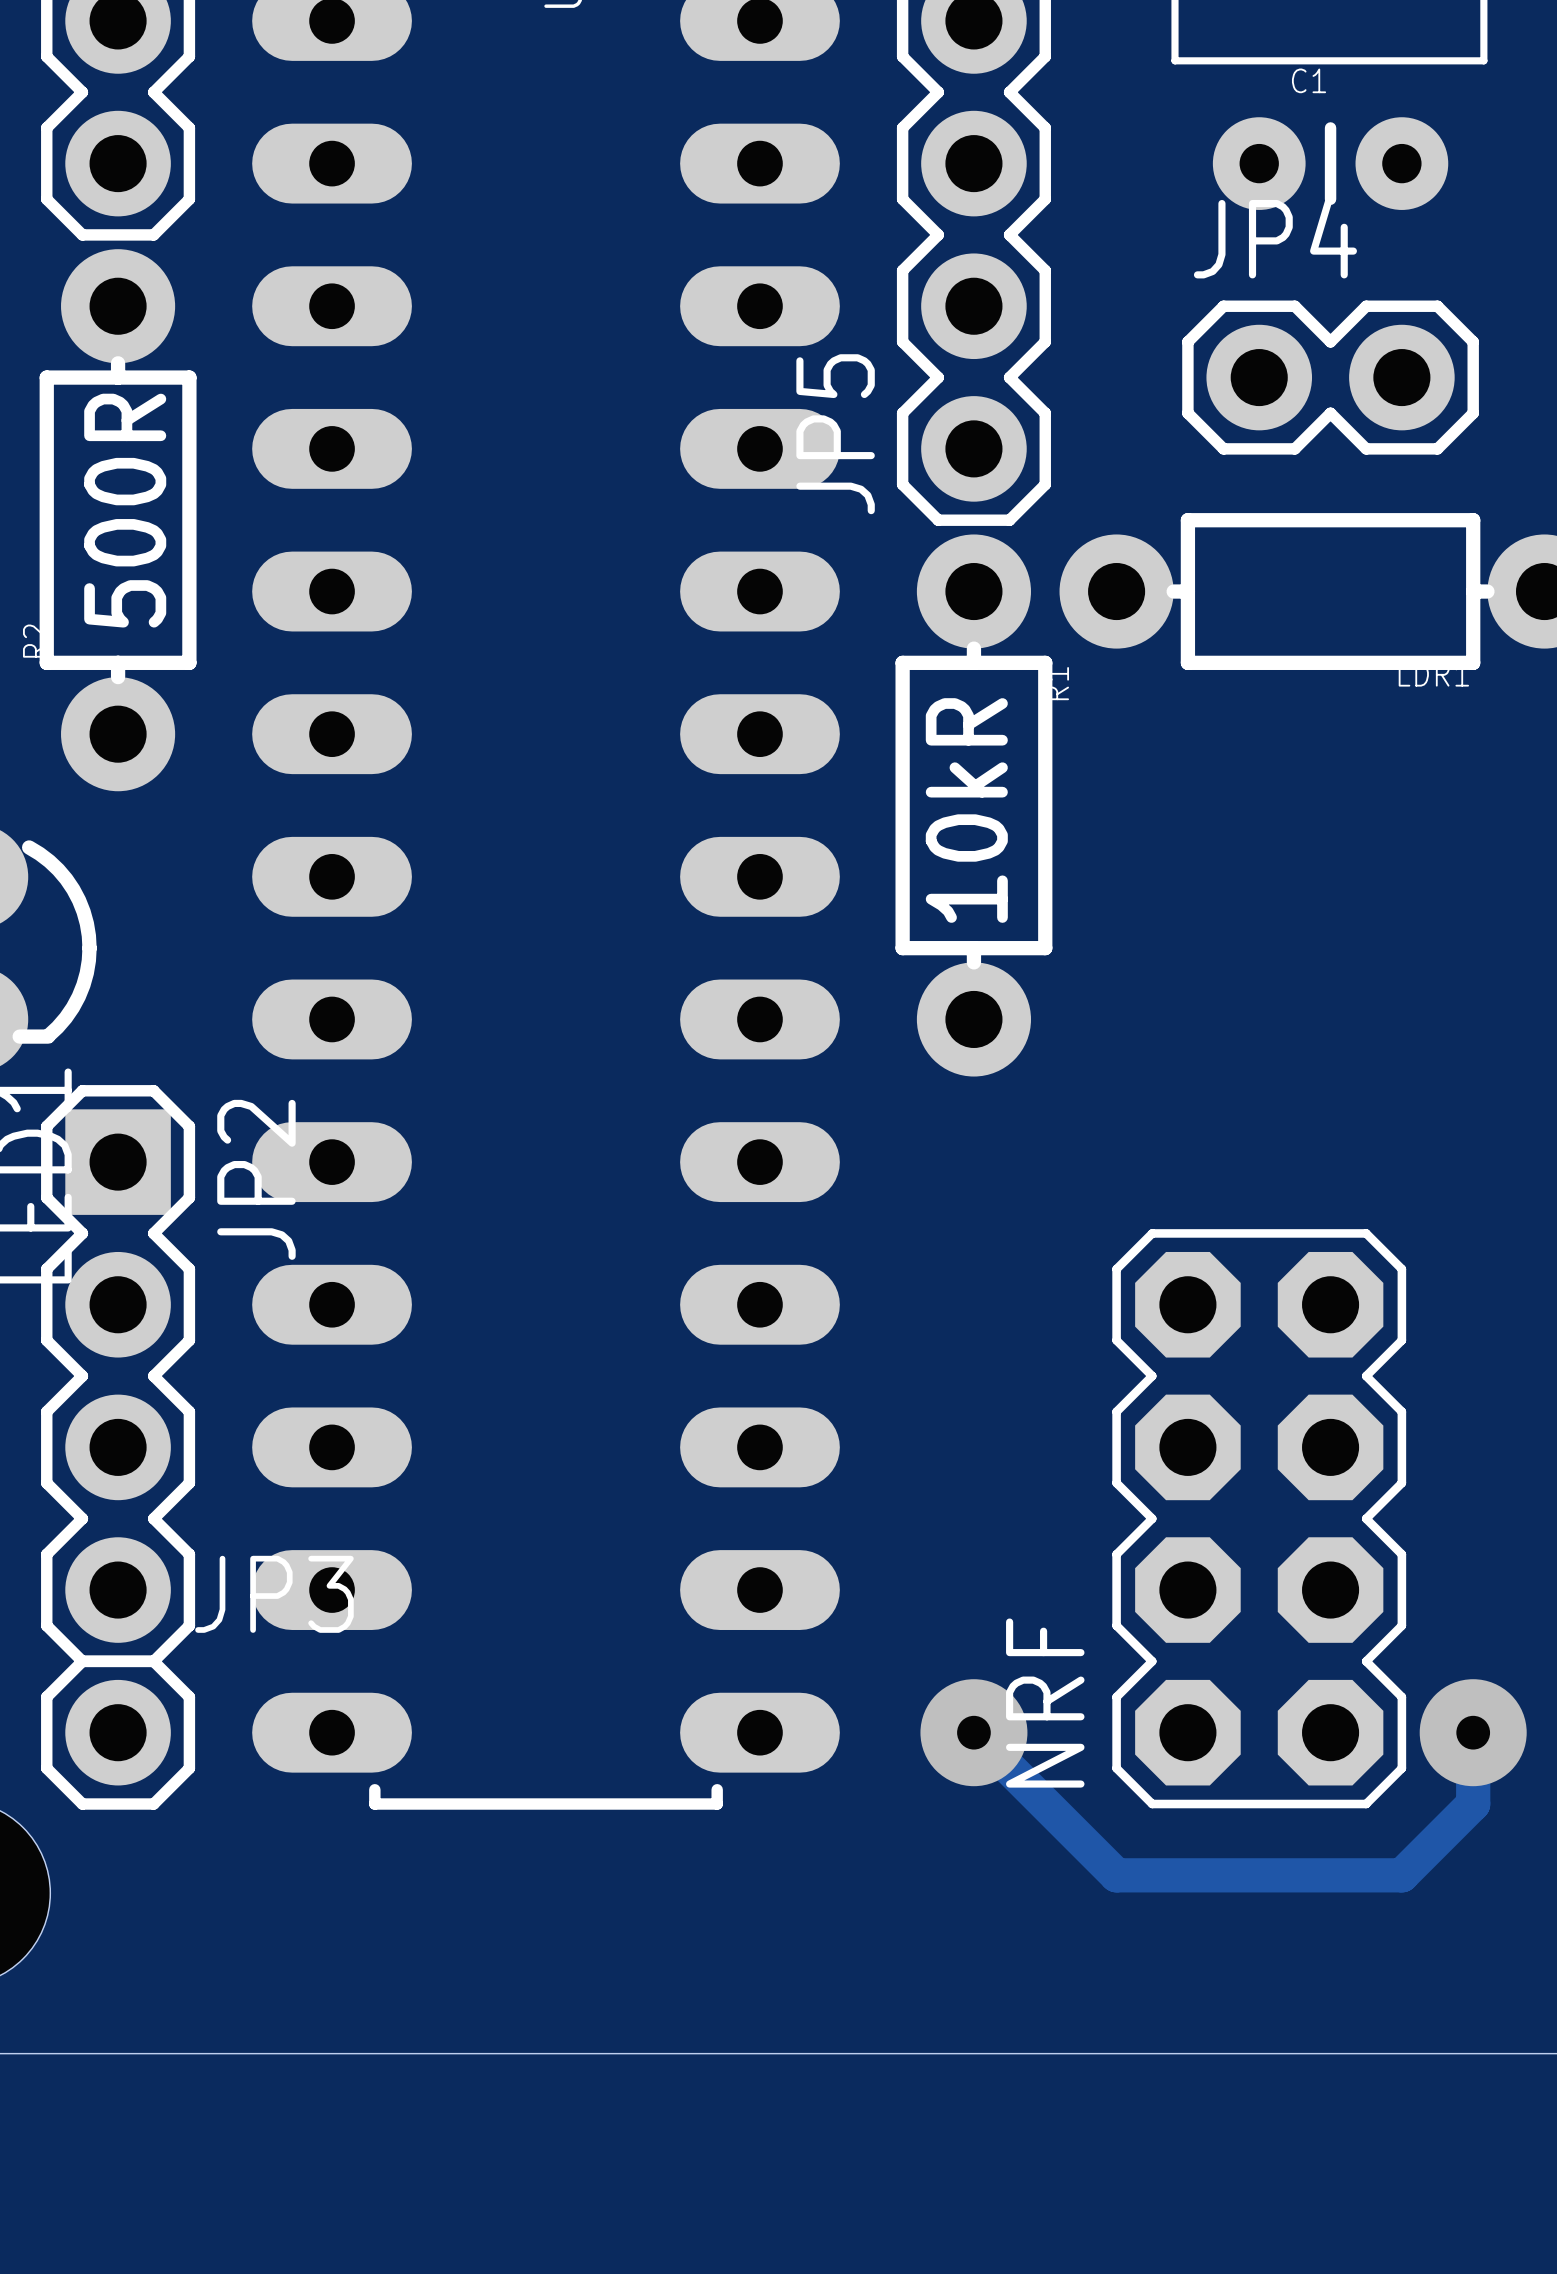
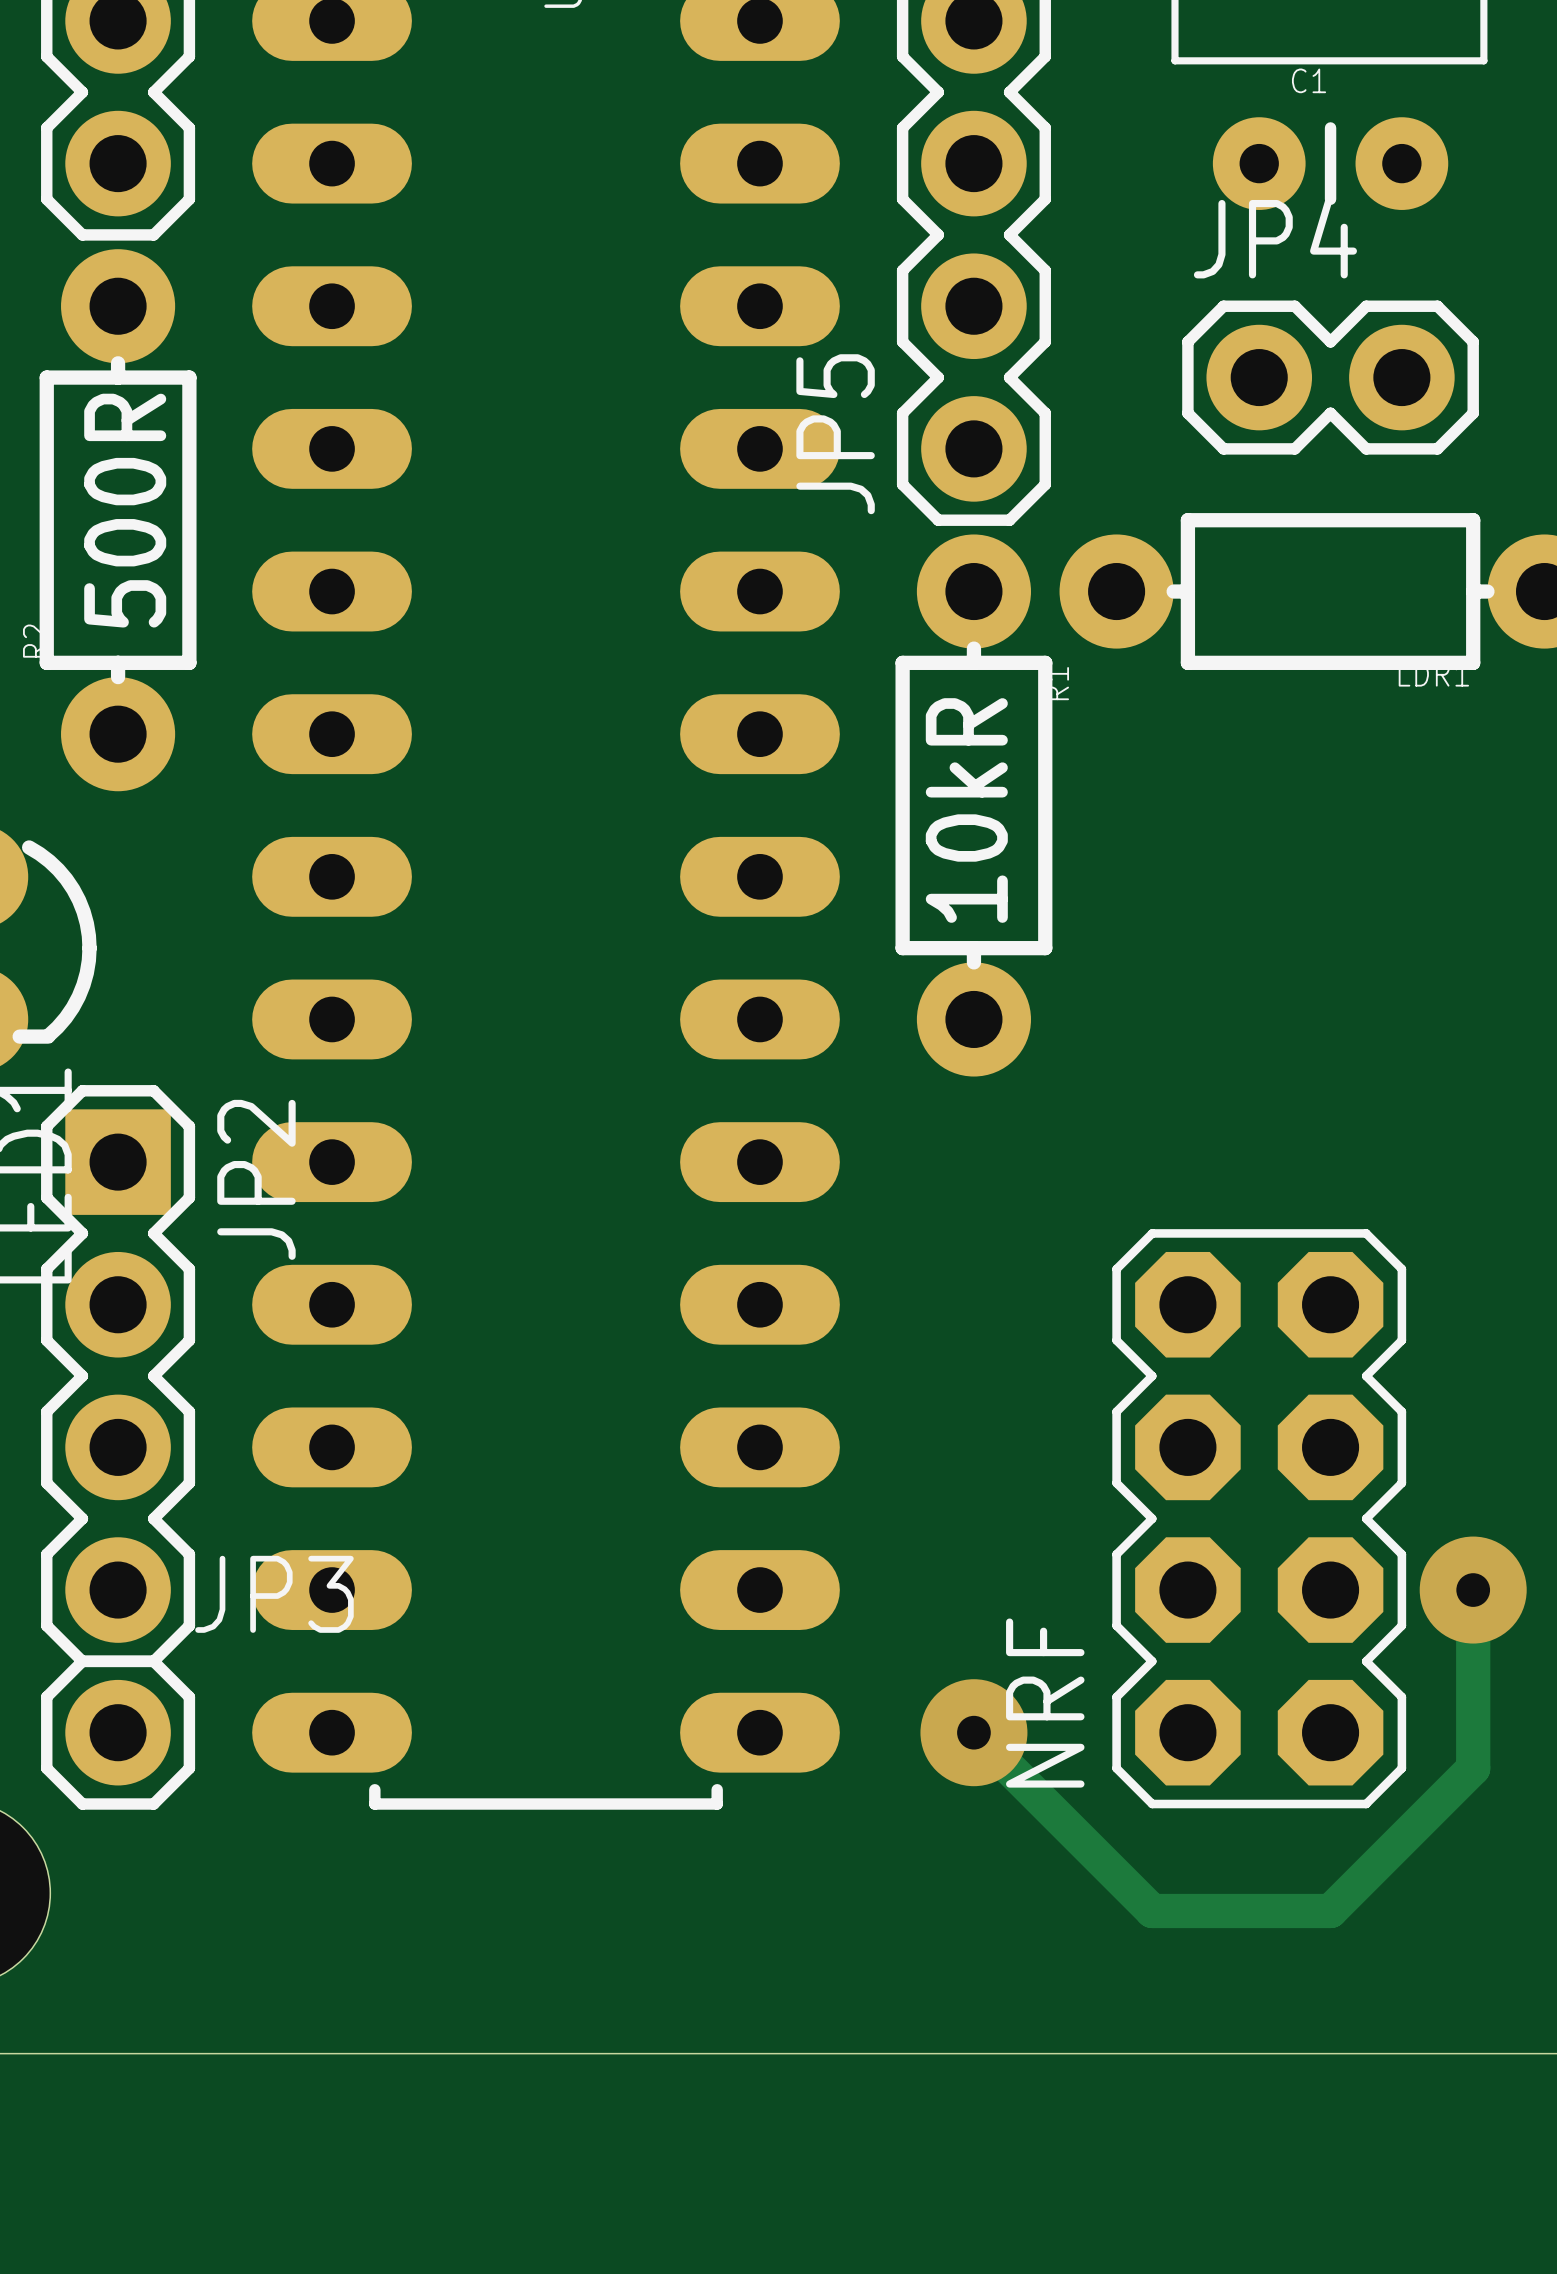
track: none -> (1473, 1590) (1473, 1732)
via position: (1473, 1732) -> (1473, 1590)
track: (1473, 1768) (1473, 1804) (1401, 1875) (1116, 1875) -> (1473, 1768) (1330, 1910) (1152, 1910) (1116, 1875)

